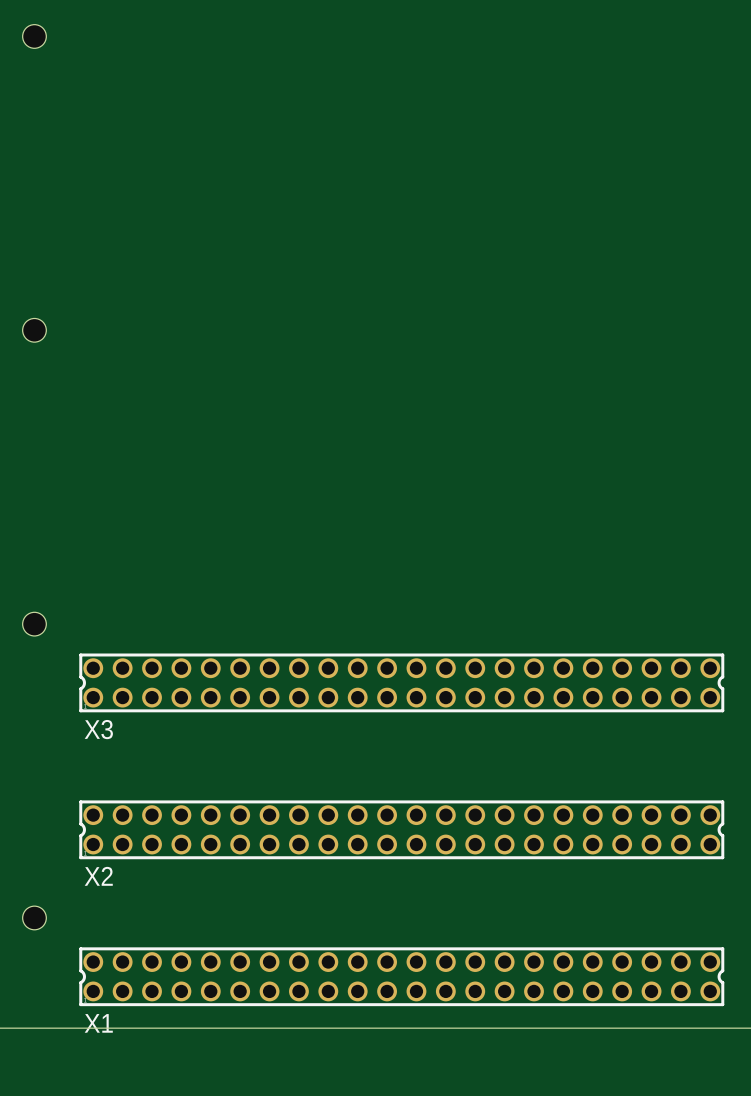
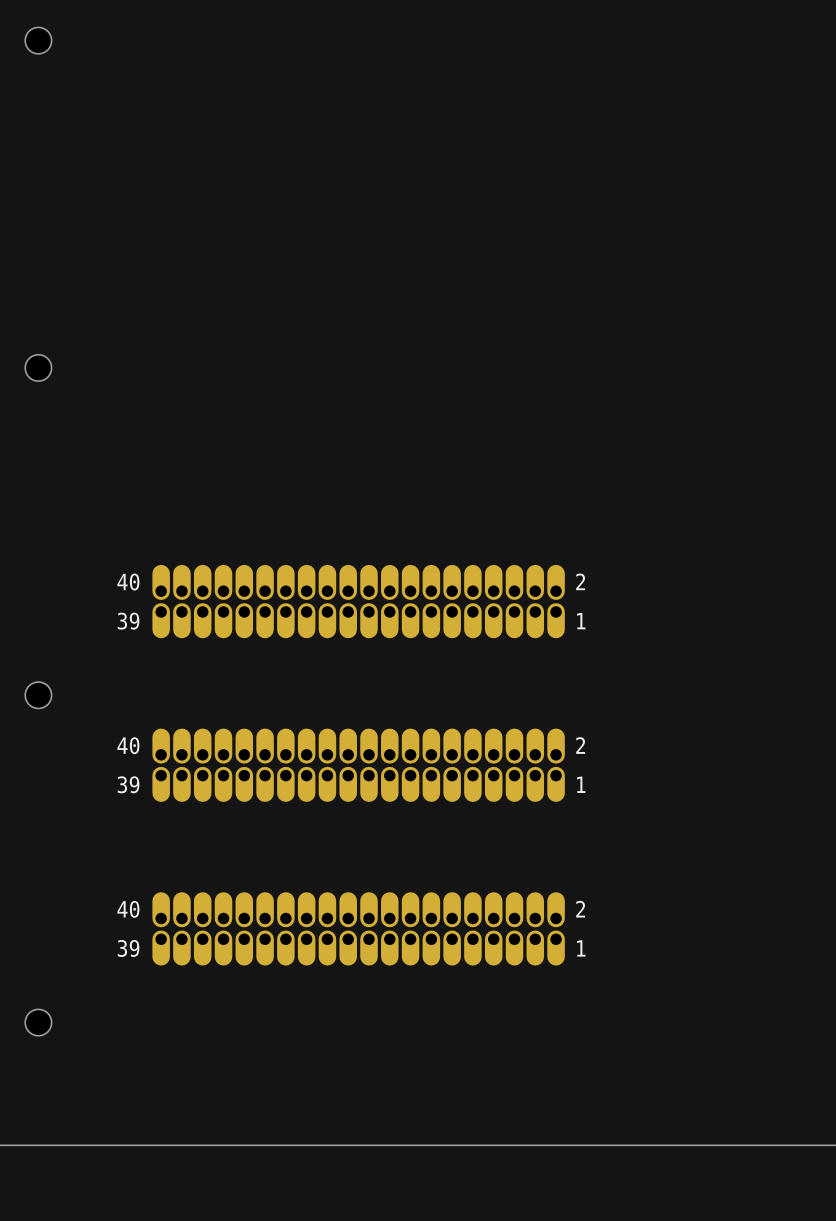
part: none -> (358, 601)
X3: (401, 682) -> none
part: none -> (358, 765)
X2: (401, 829) -> none
part: none -> (358, 928)
X1: (401, 976) -> none

